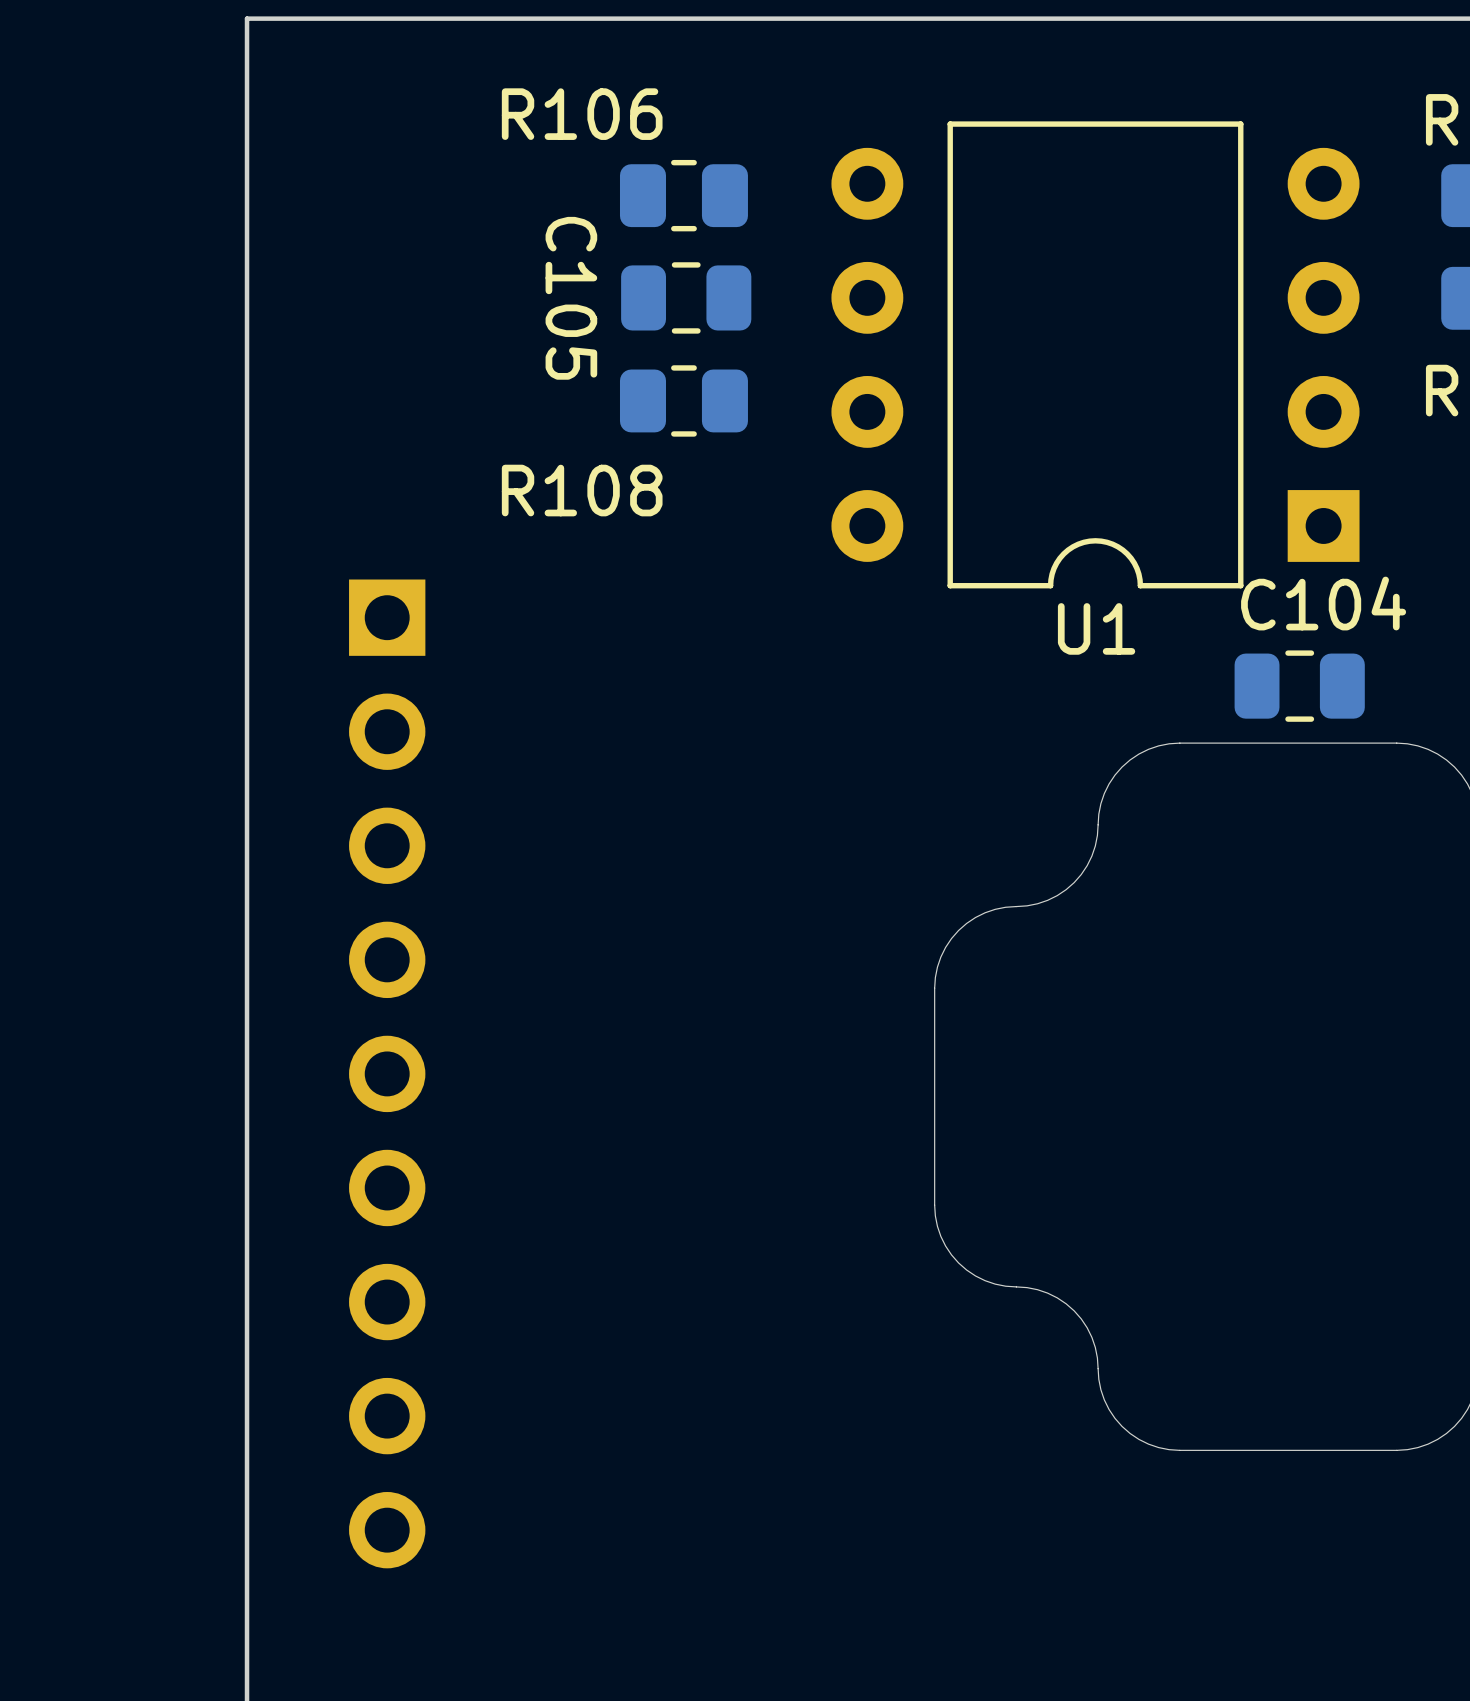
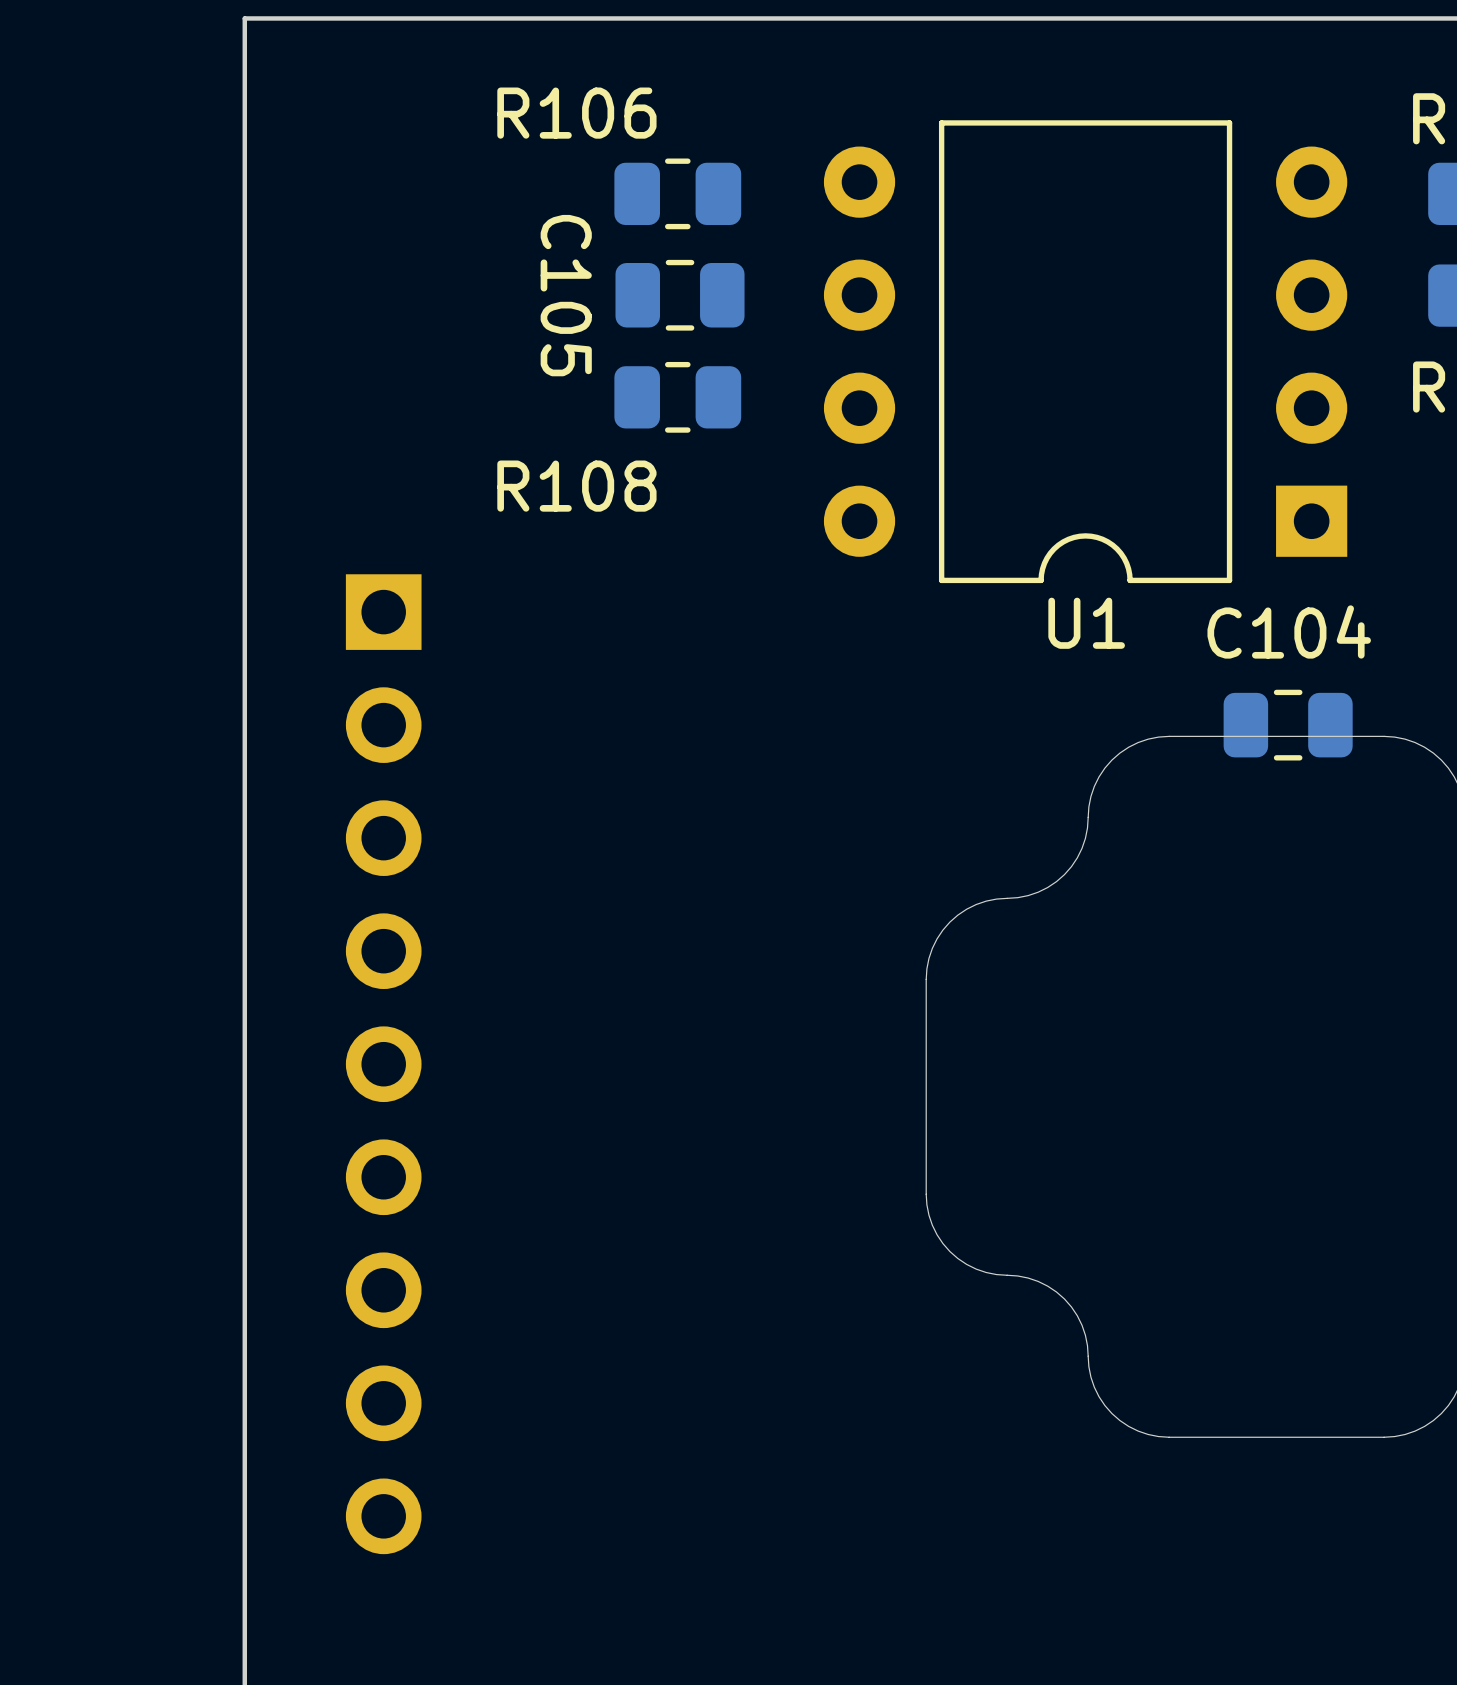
C104 name position: C104 (1323, 603) -> C104 (1289, 631)
C104 position: (1299, 686) -> (1288, 725)

